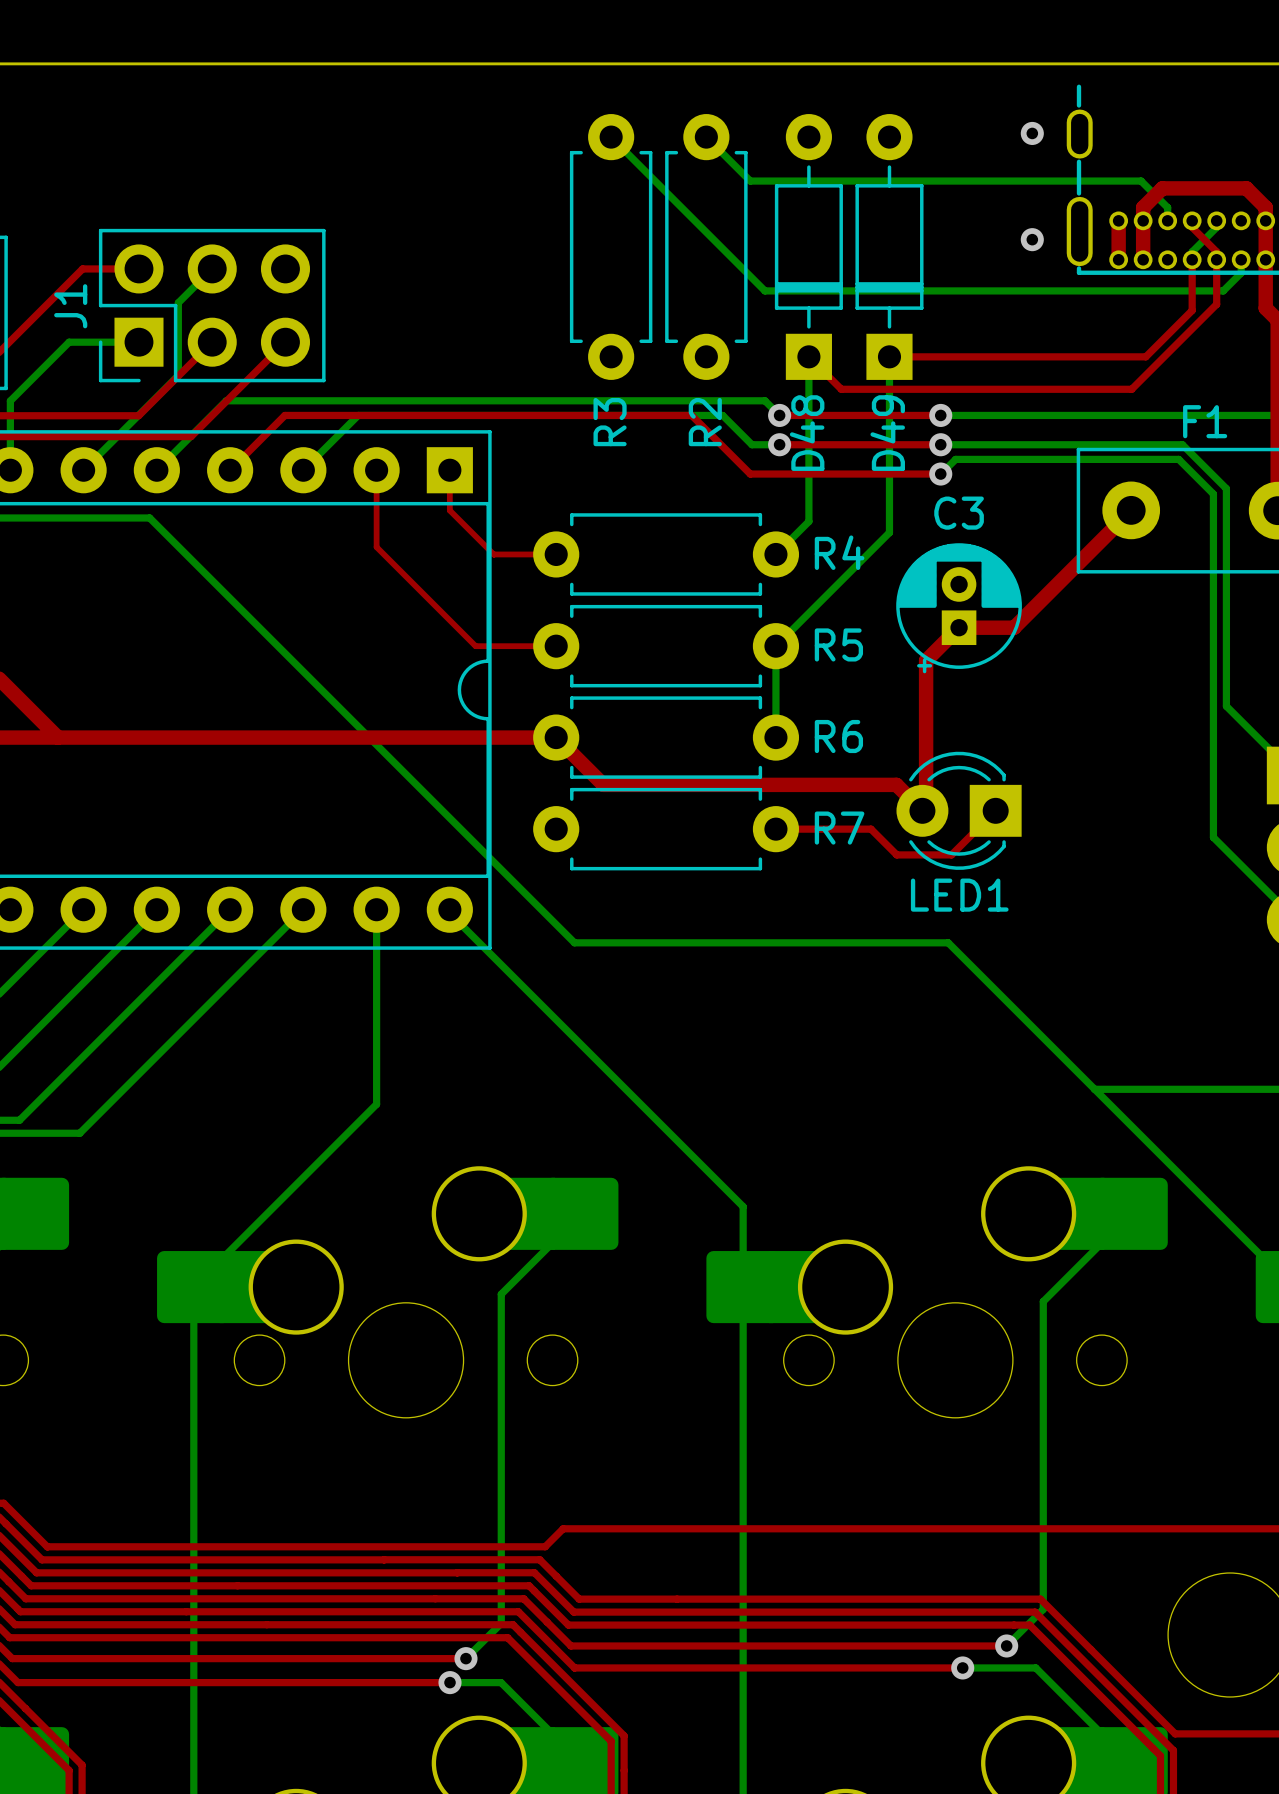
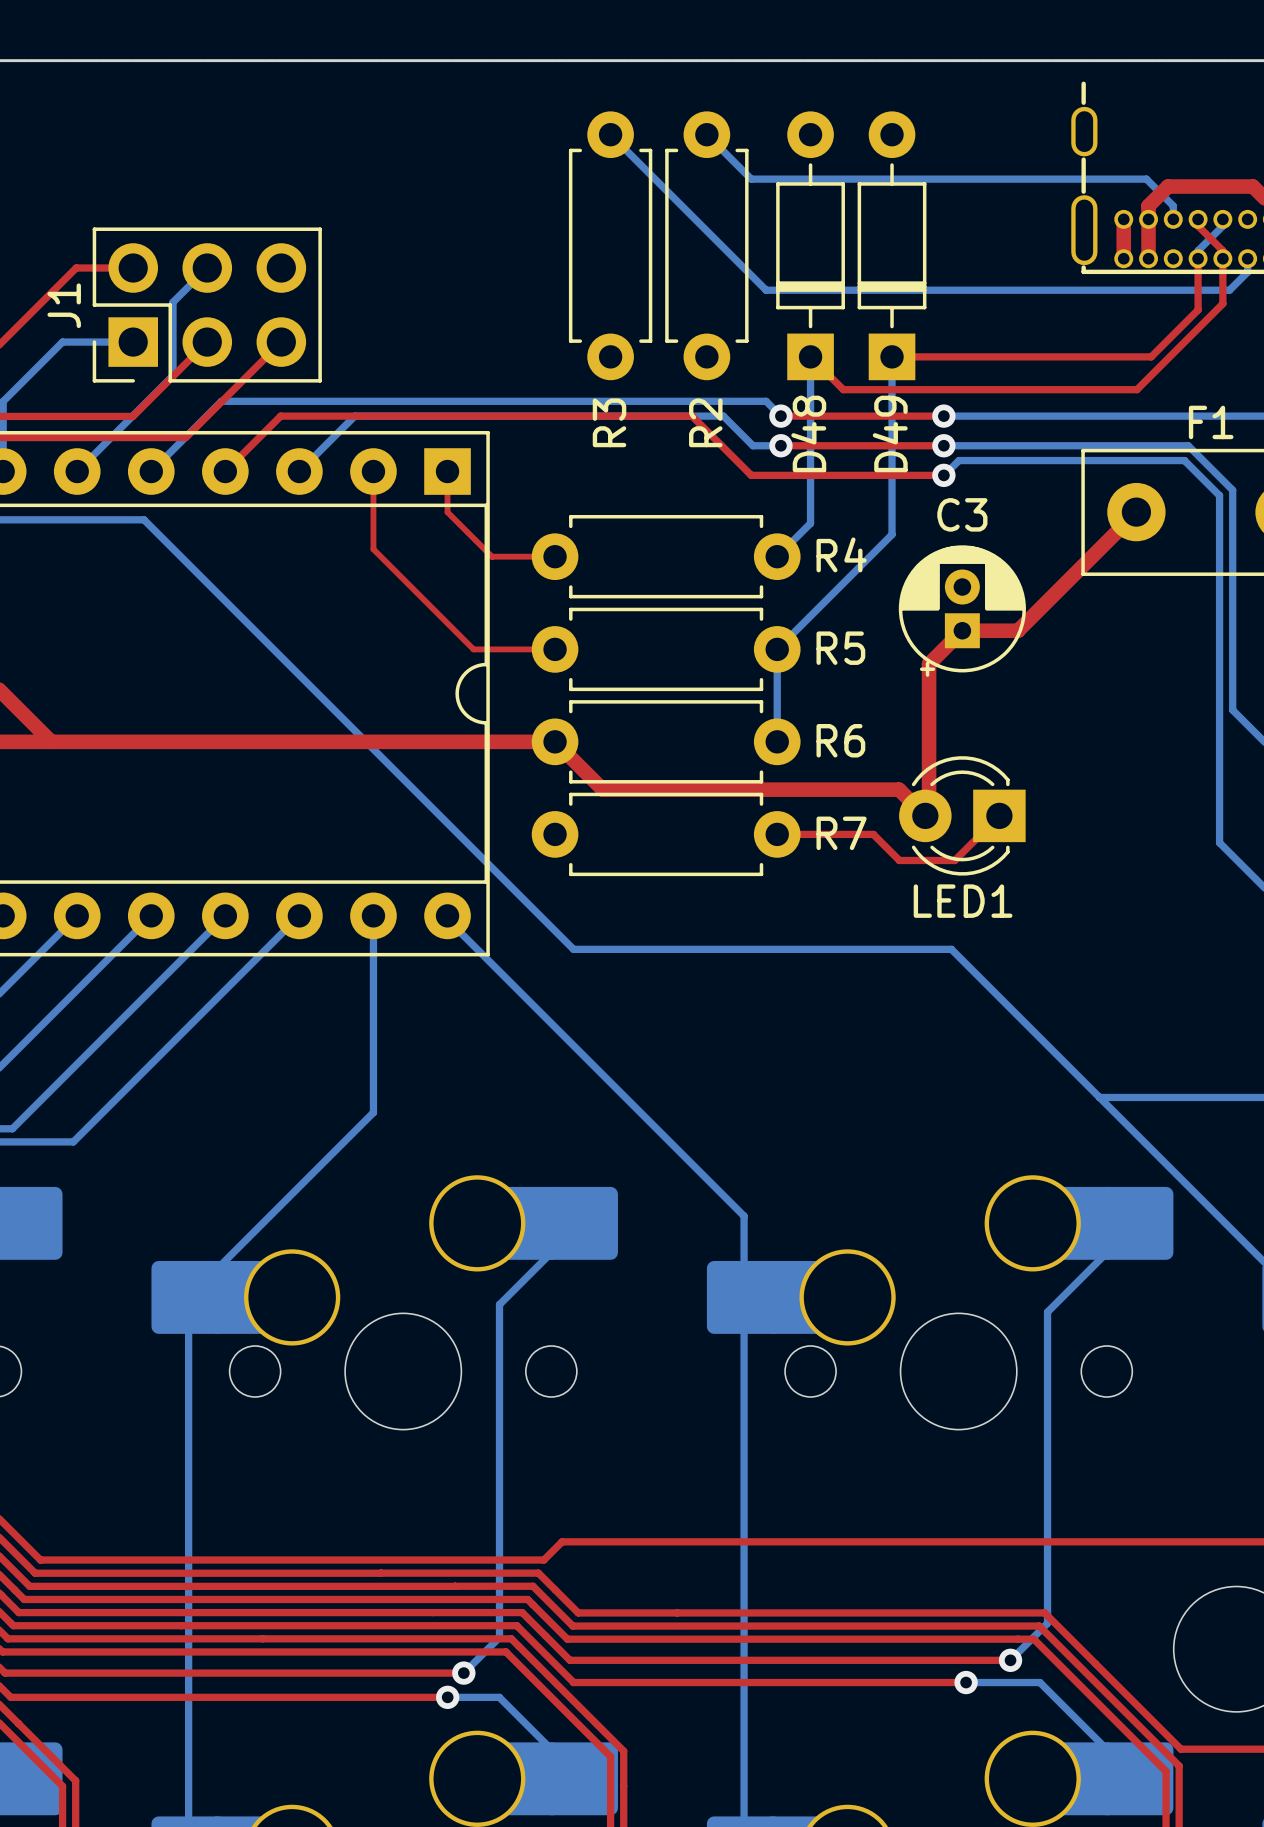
via: (1032, 133) -> none
via: (1032, 239) -> none

